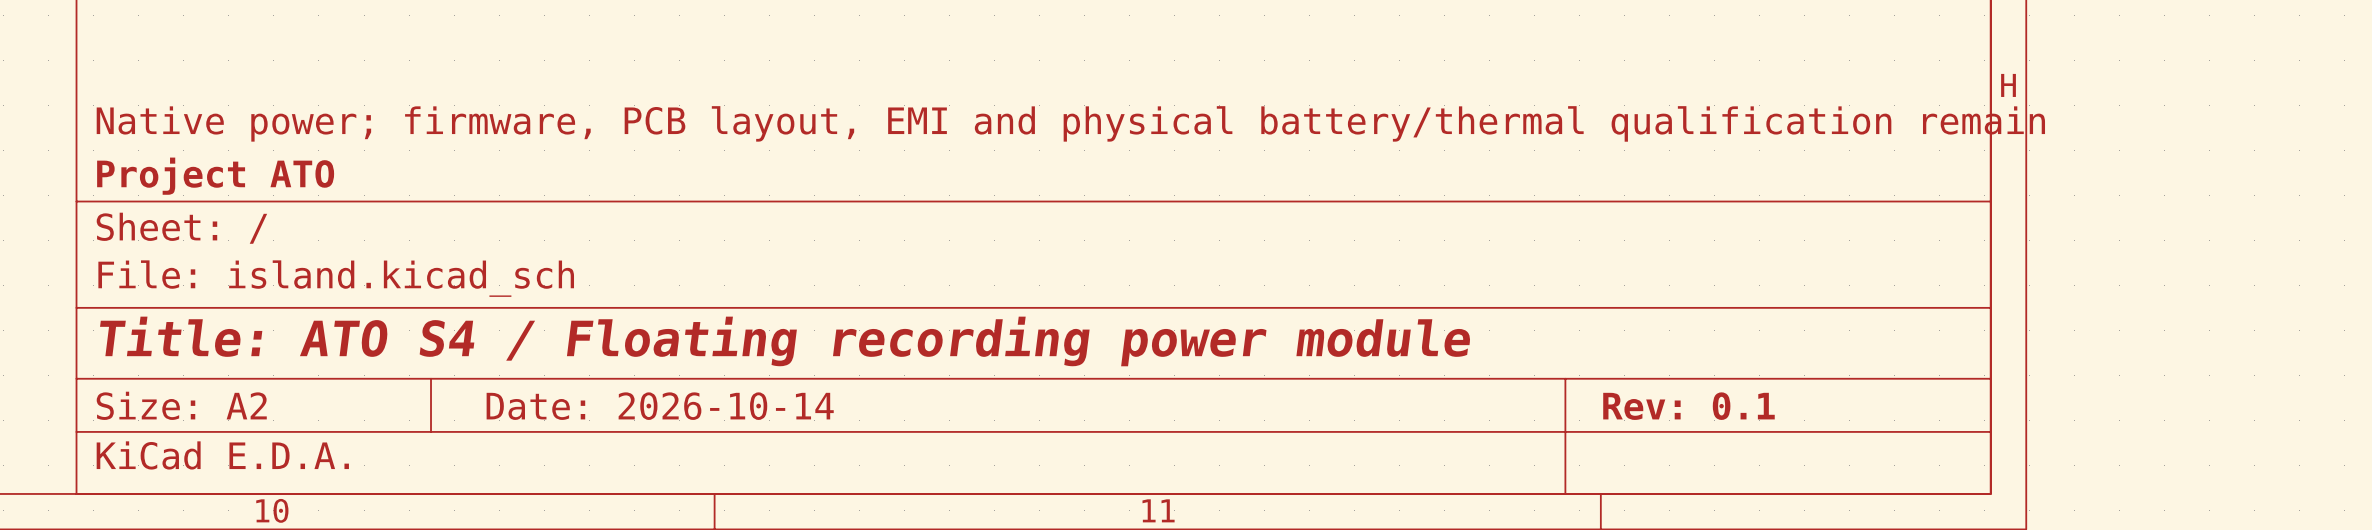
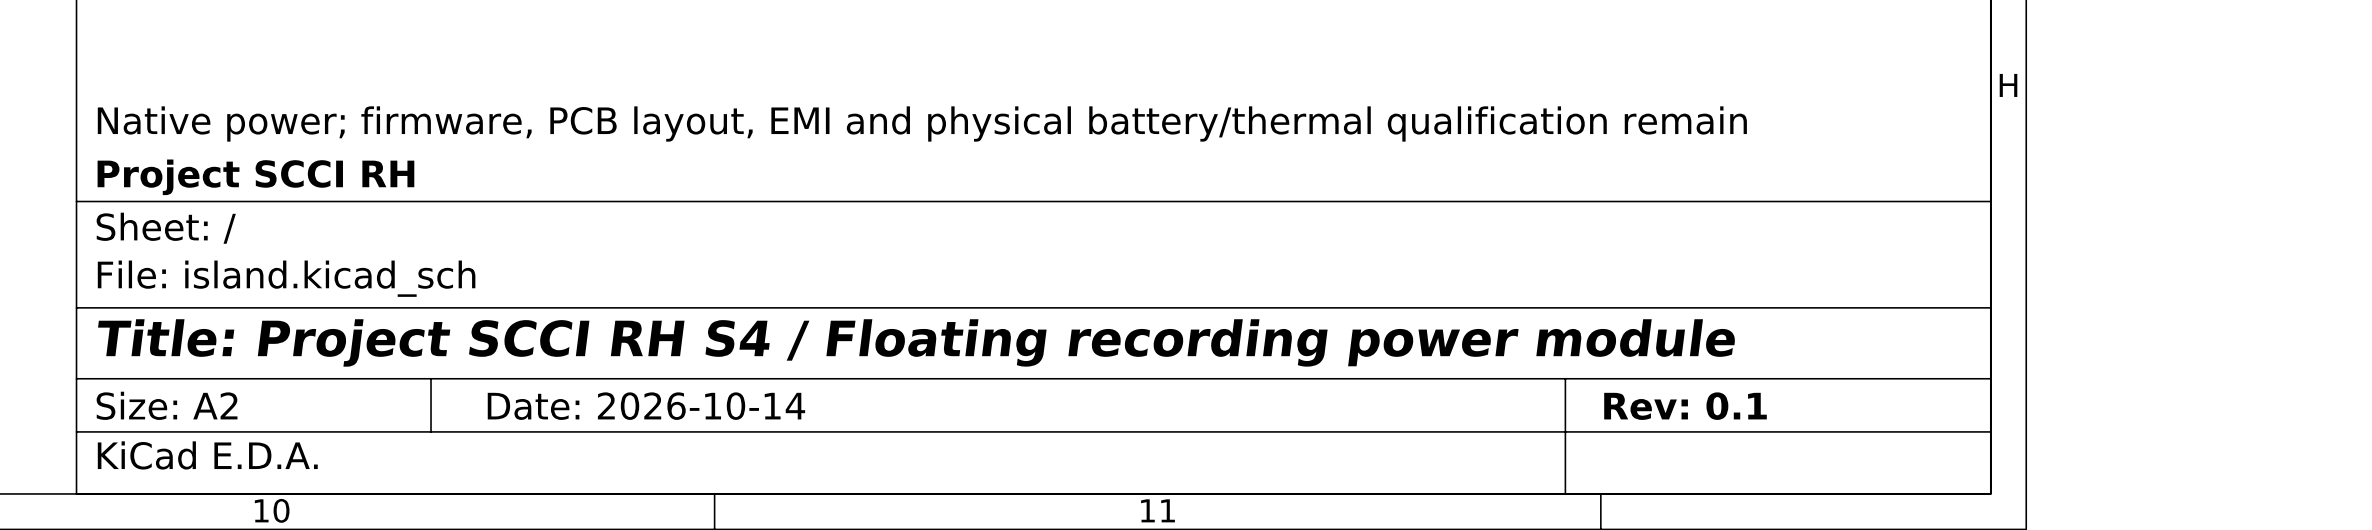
title block: Project ATO (215, 176) -> Project SCCI RH (255, 177)
title block: Title: ATO S4 / Floating recording power module (785, 341) -> Title: Project SCCI RH S4 / Floating recording power module (916, 342)

